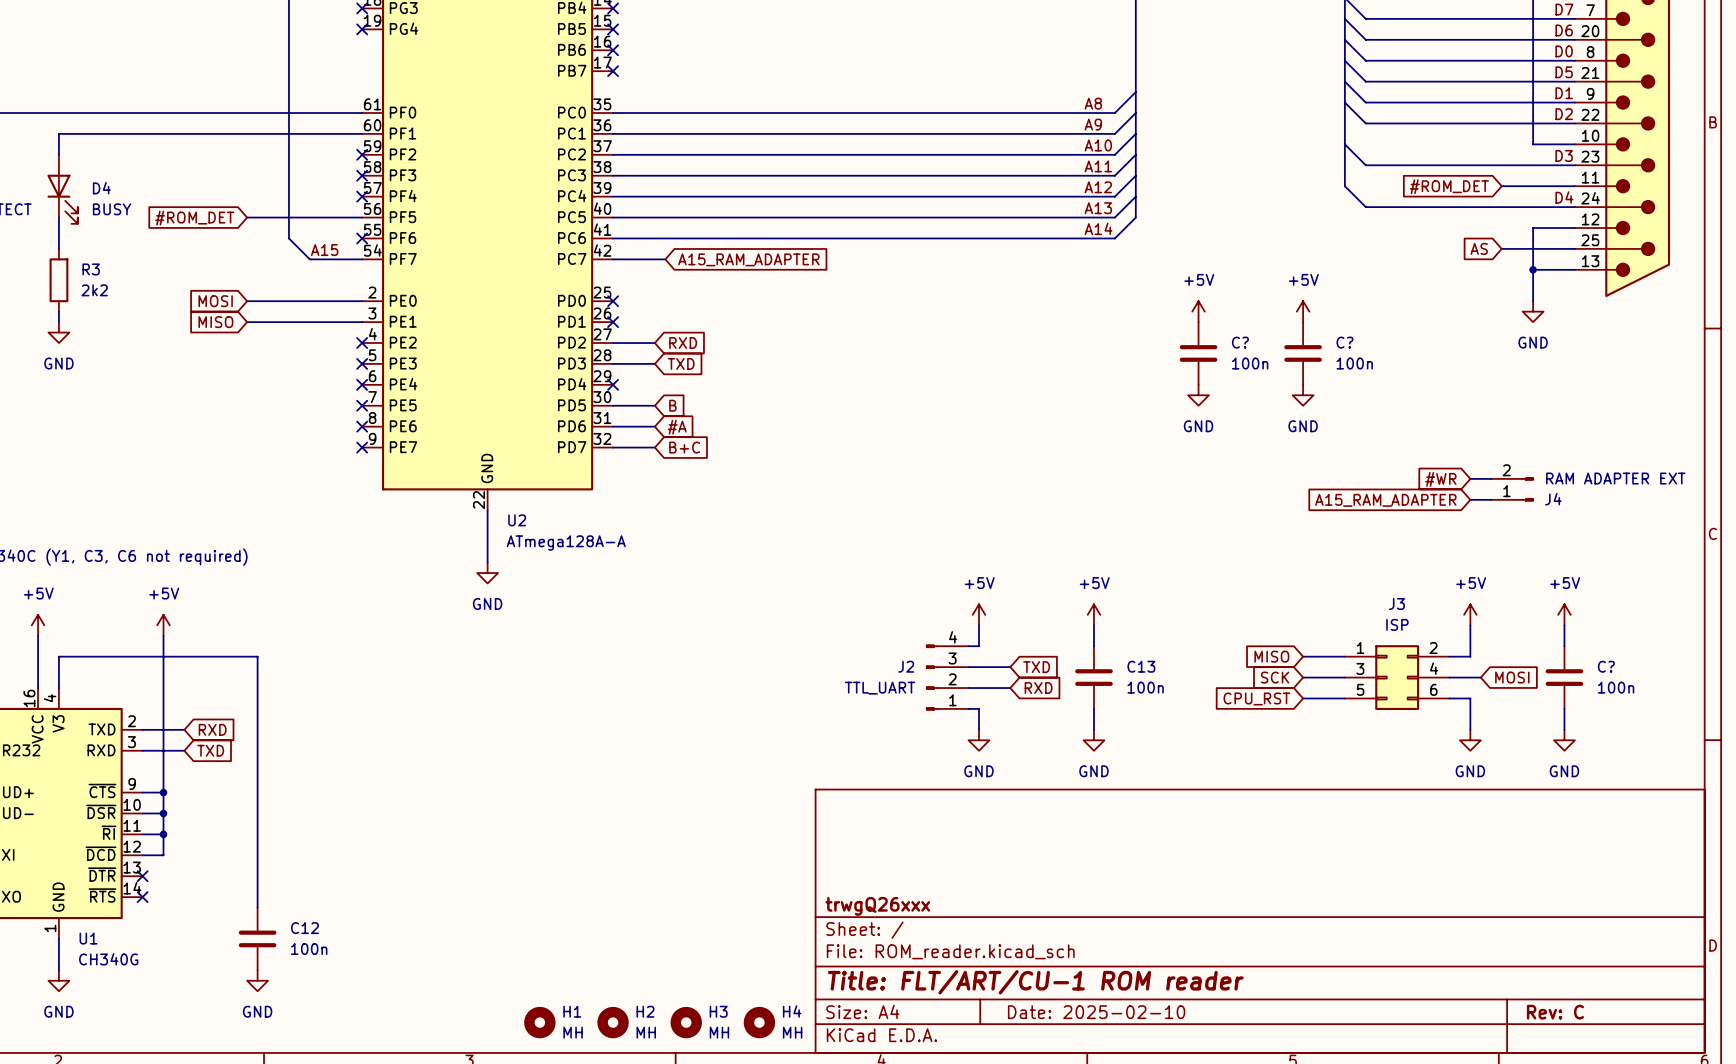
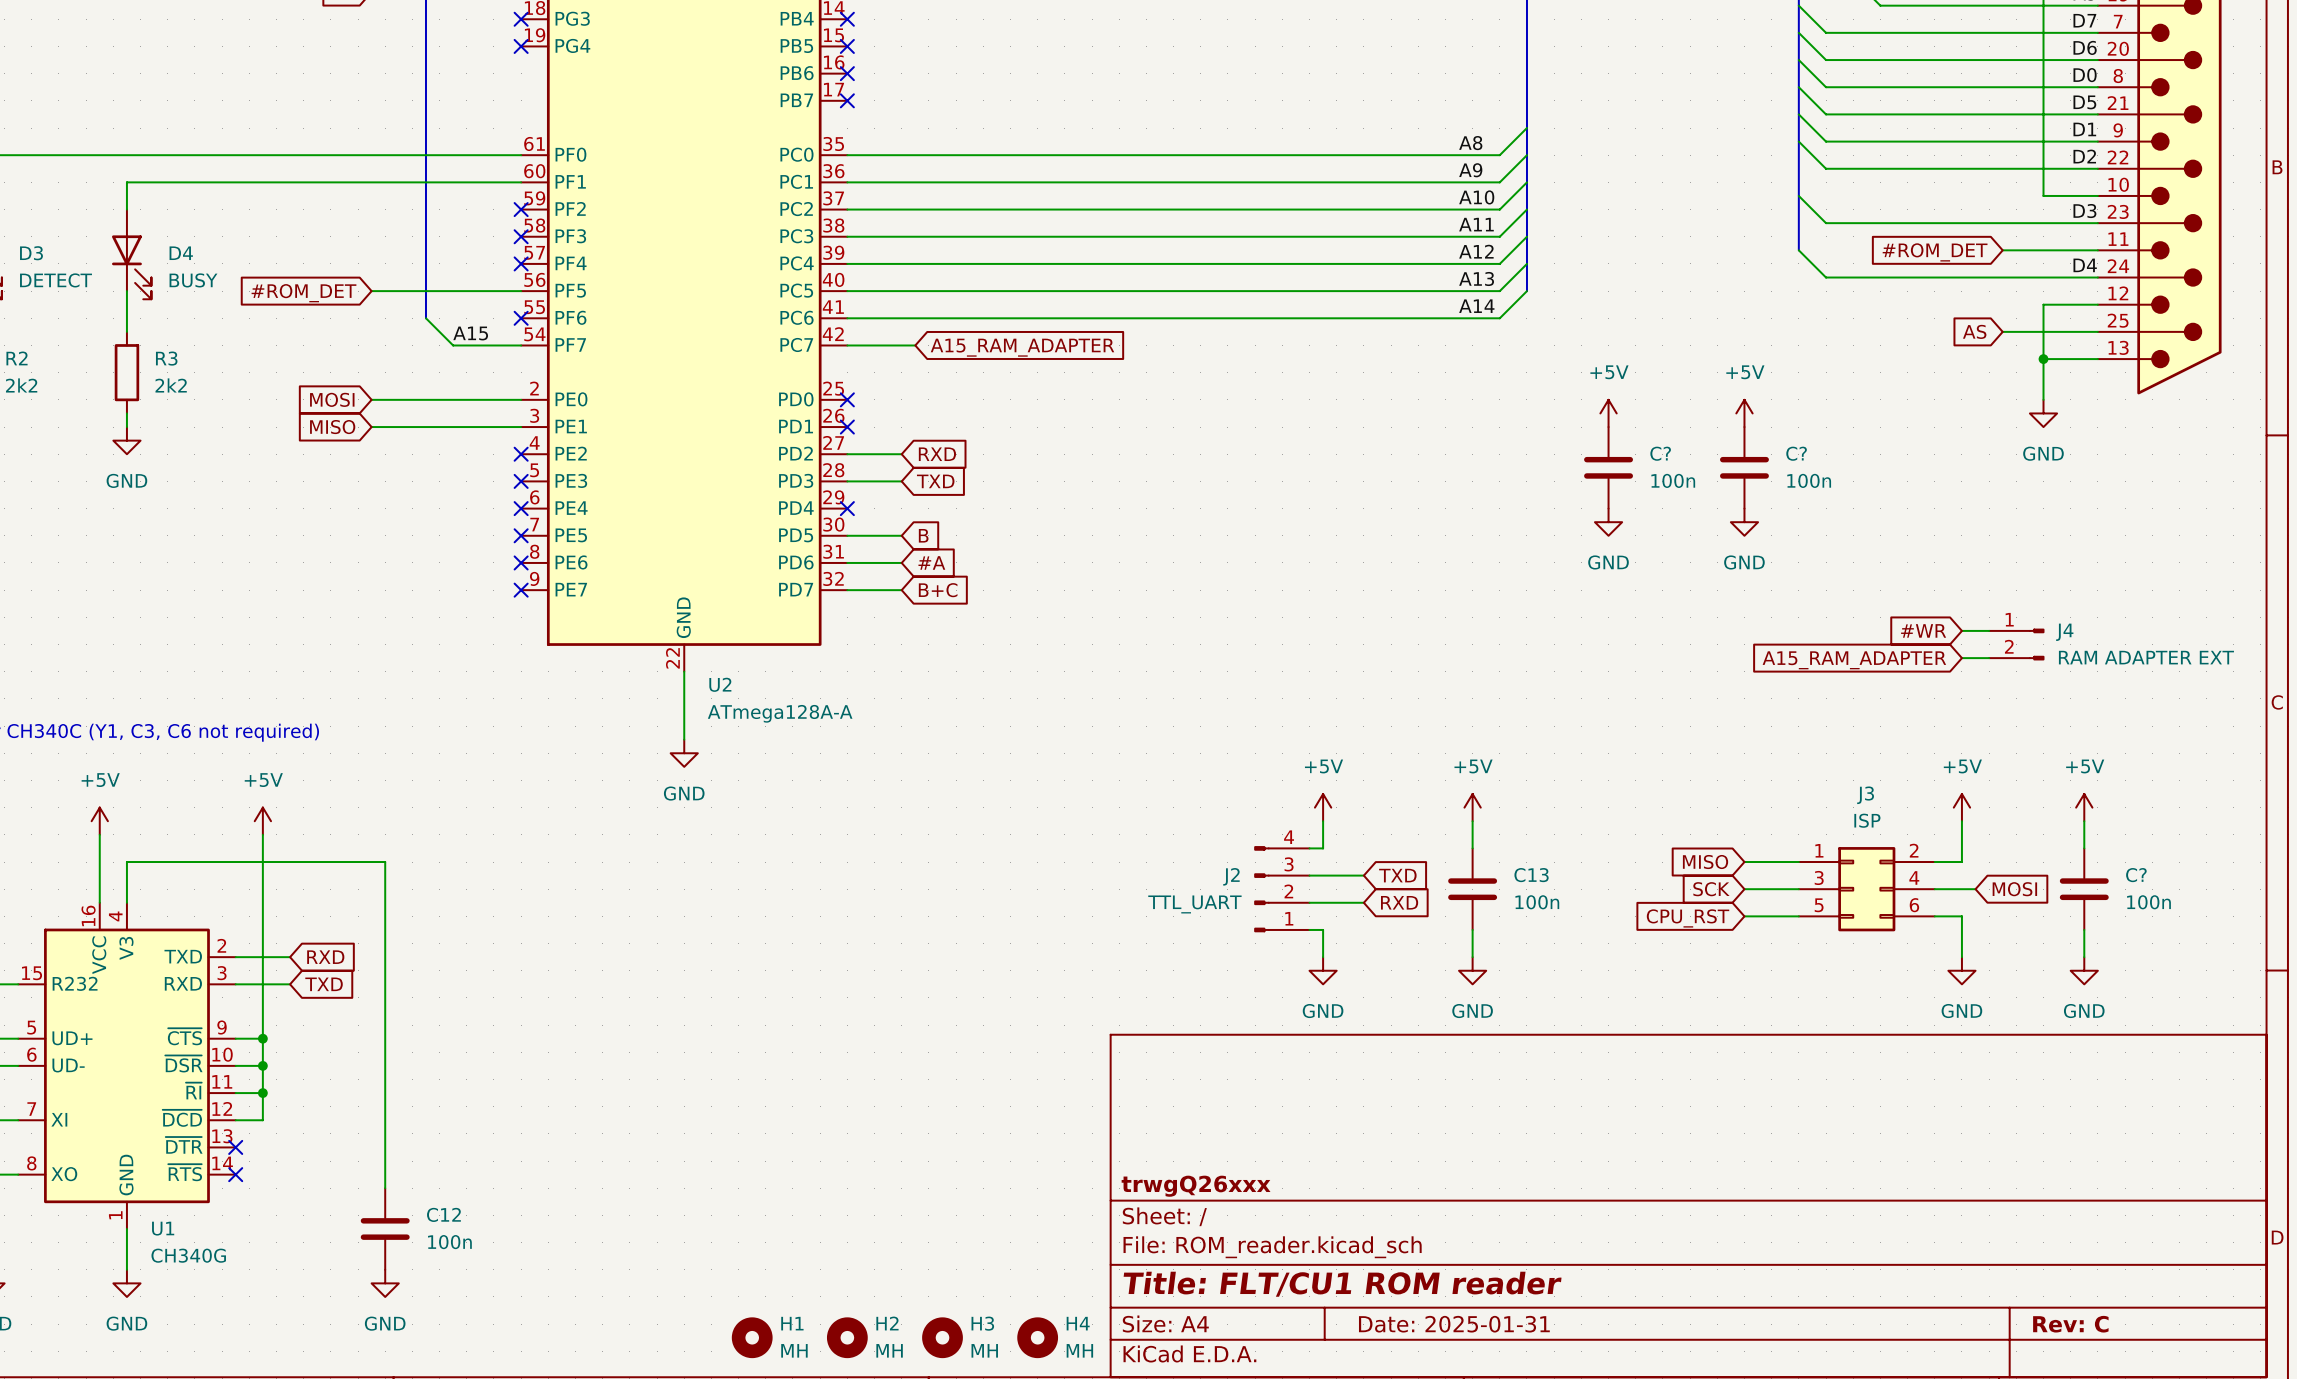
J4 flip: as is (1527, 489) -> up-down (2036, 644)
title block: Title: FLT/ART/CU-1 ROM reader (1035, 982) -> Title: FLT/CU1 ROM reader (1342, 1284)
title block: Date: 2025-02-10 (1096, 1012) -> Date: 2025-01-31 (1454, 1324)

